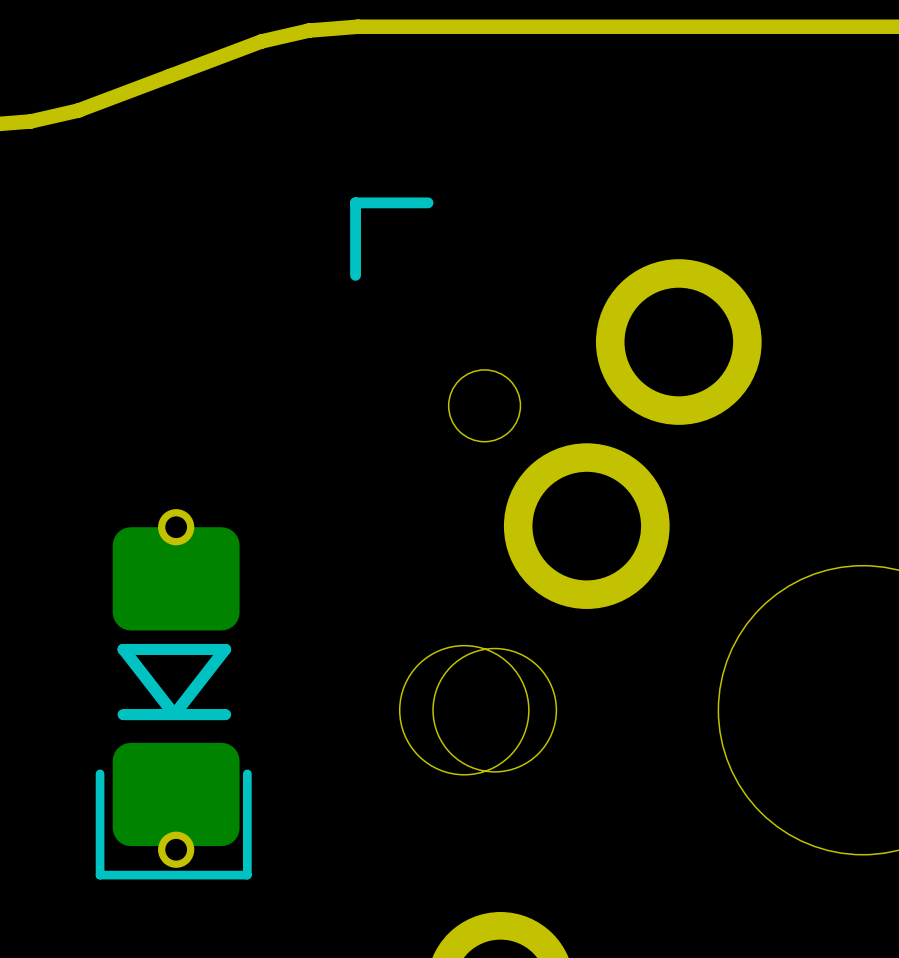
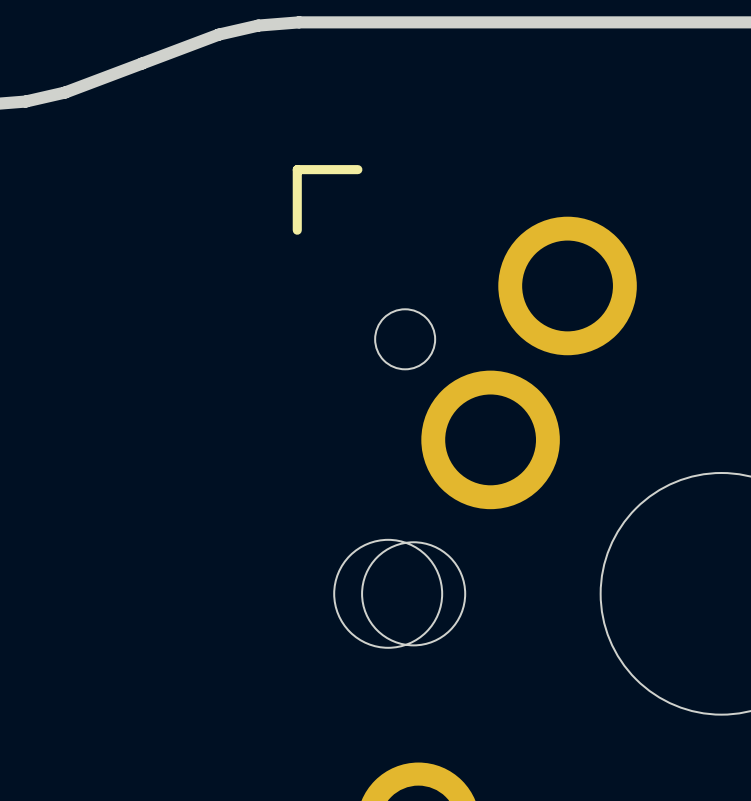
part: (173, 694) -> none

